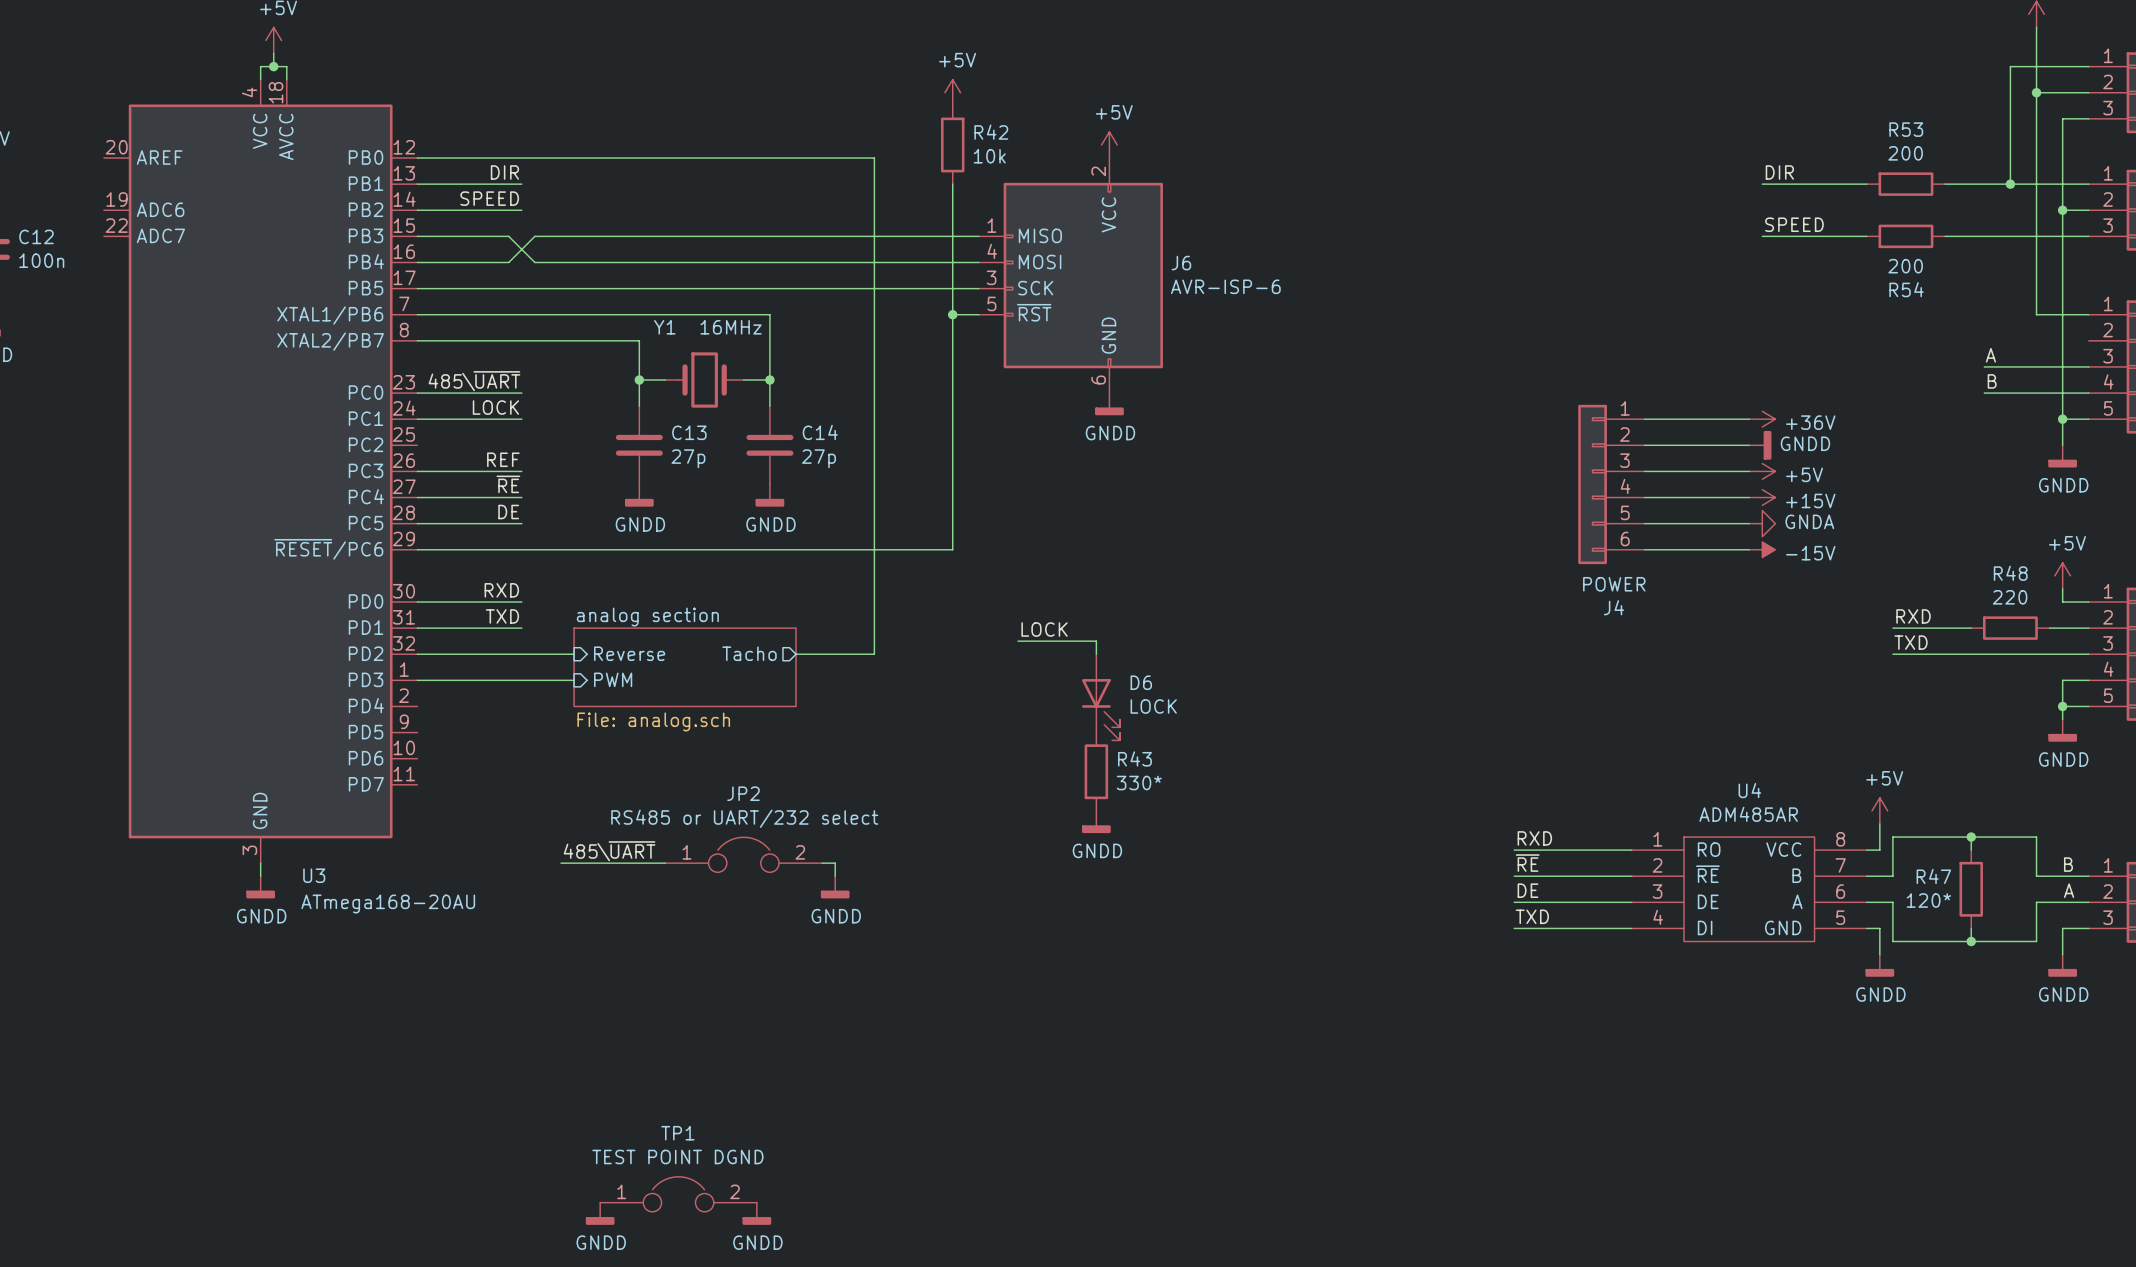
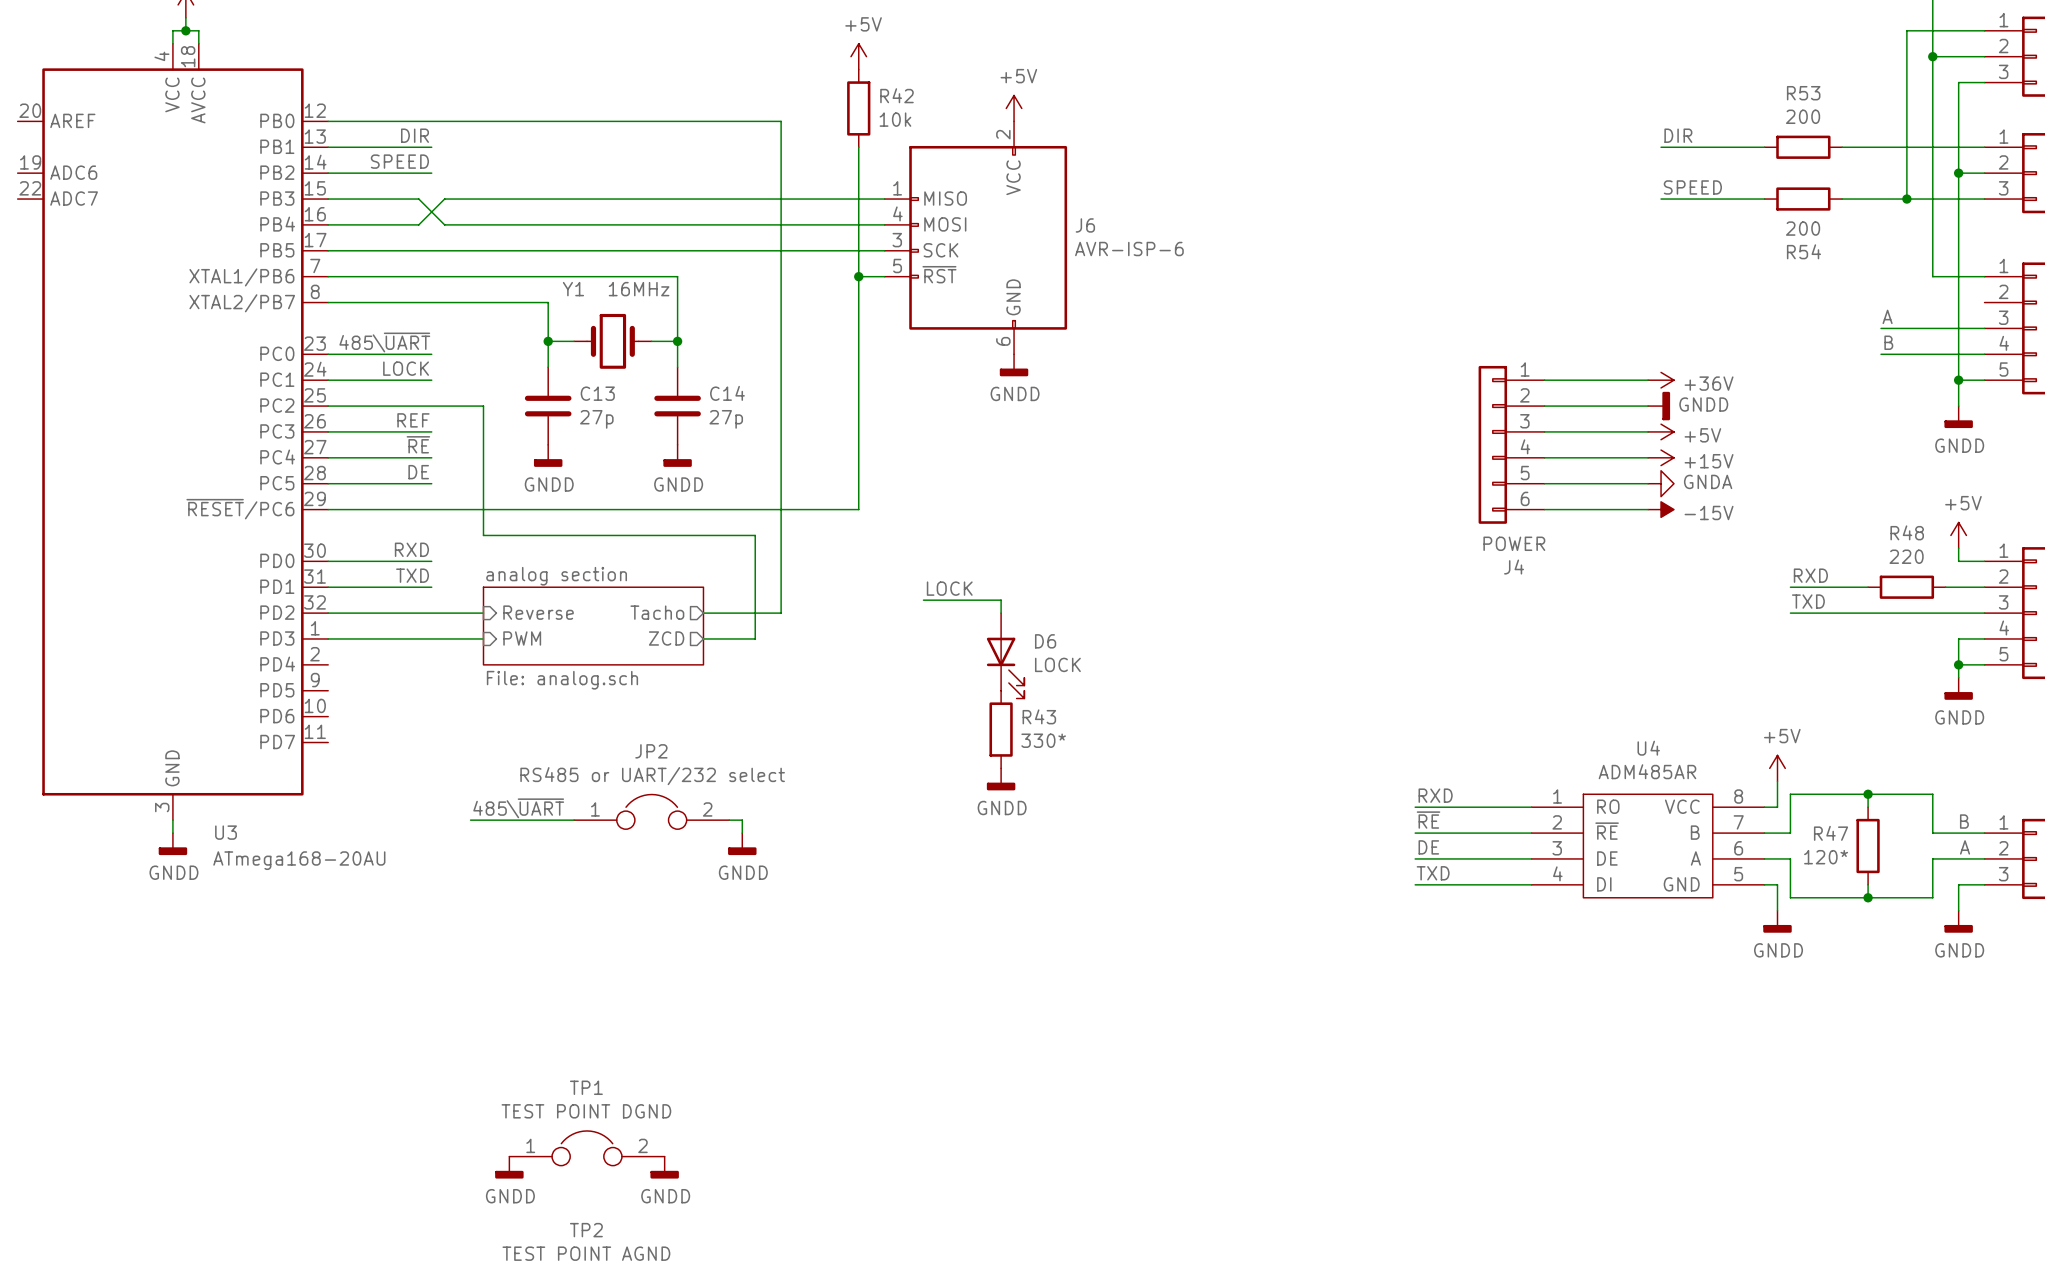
wire: none -> (1906, 147) (1906, 199)
junction position: (2010, 184) -> (1906, 199)
wire: none -> (328, 406) (483, 406) (483, 535) (755, 535) (755, 638) (703, 638)
sheet pin: none -> ZCD (666, 638)

